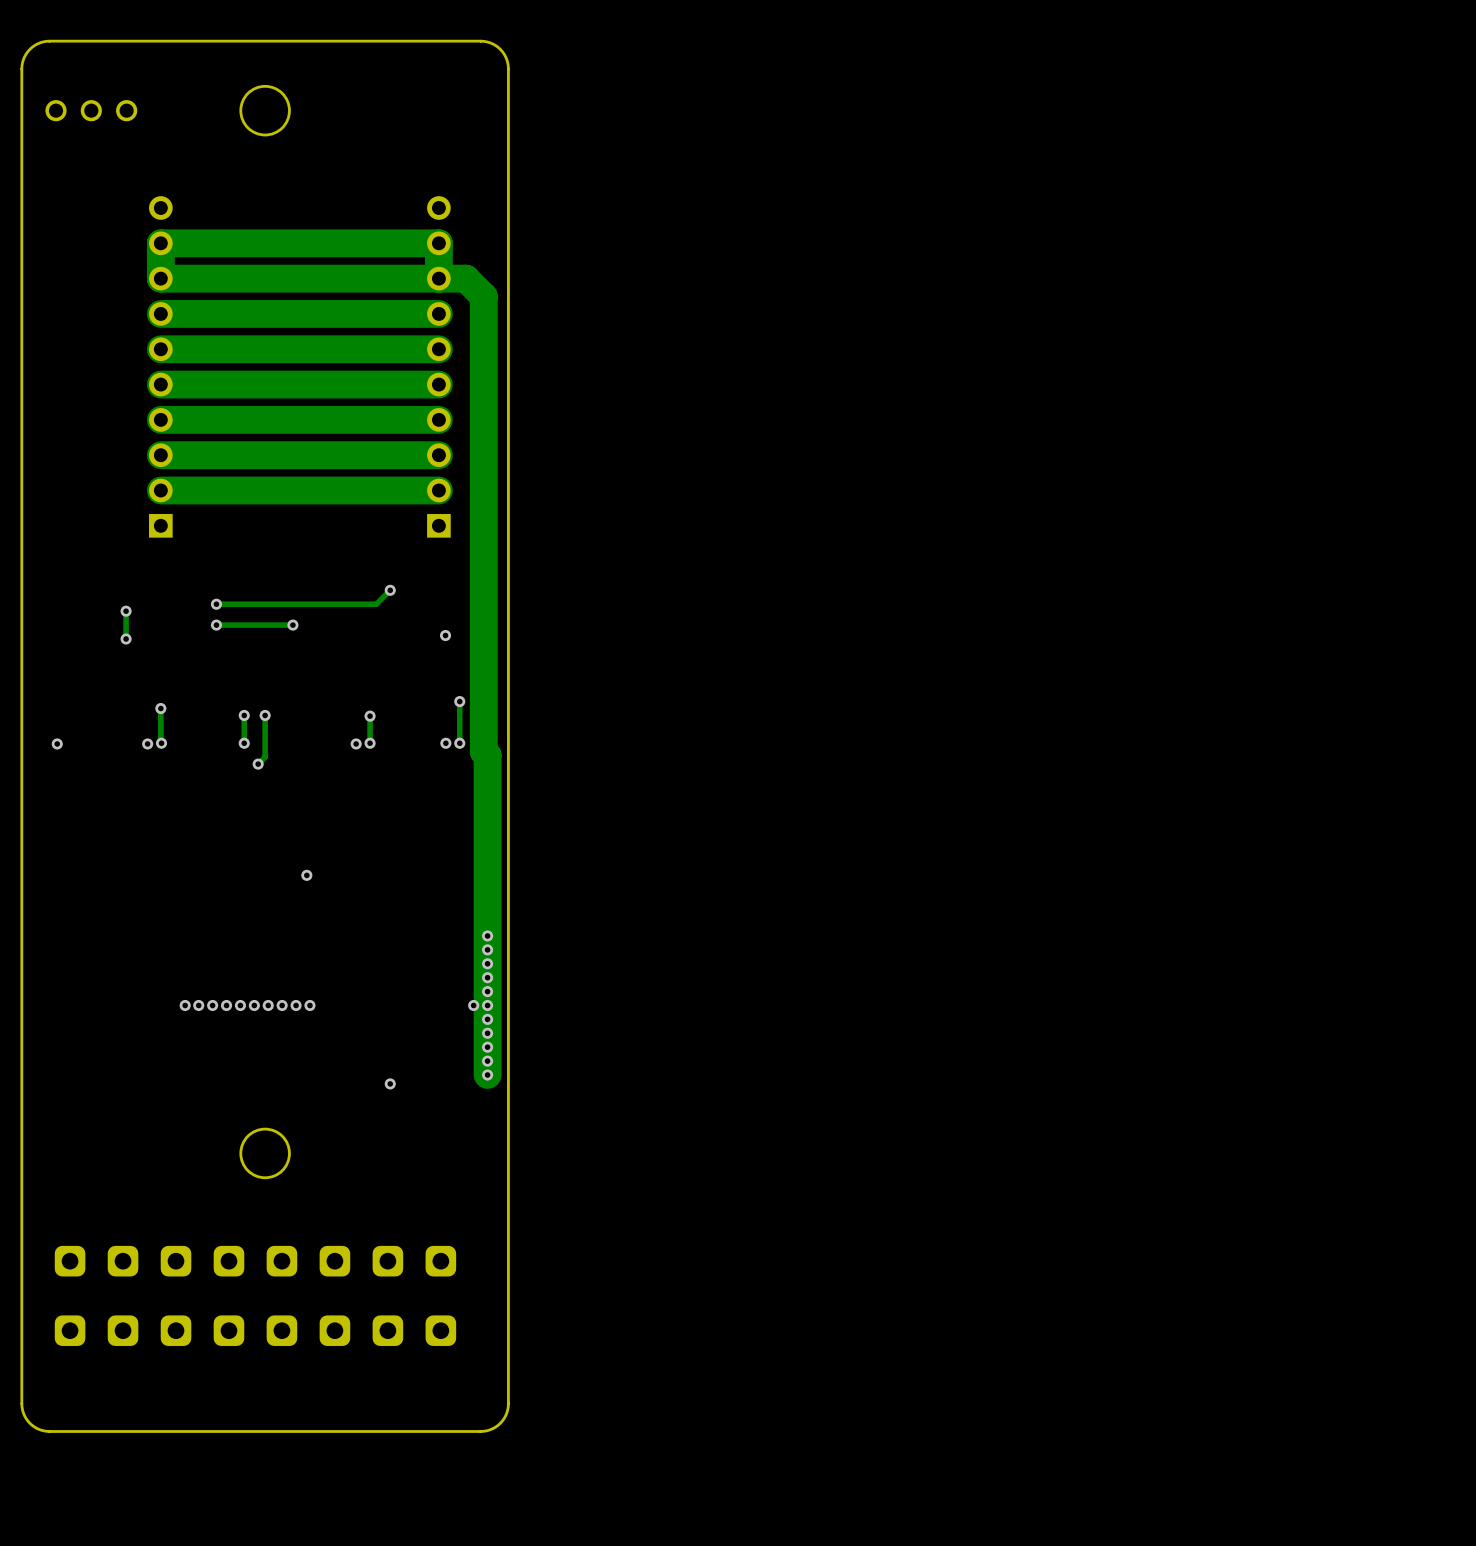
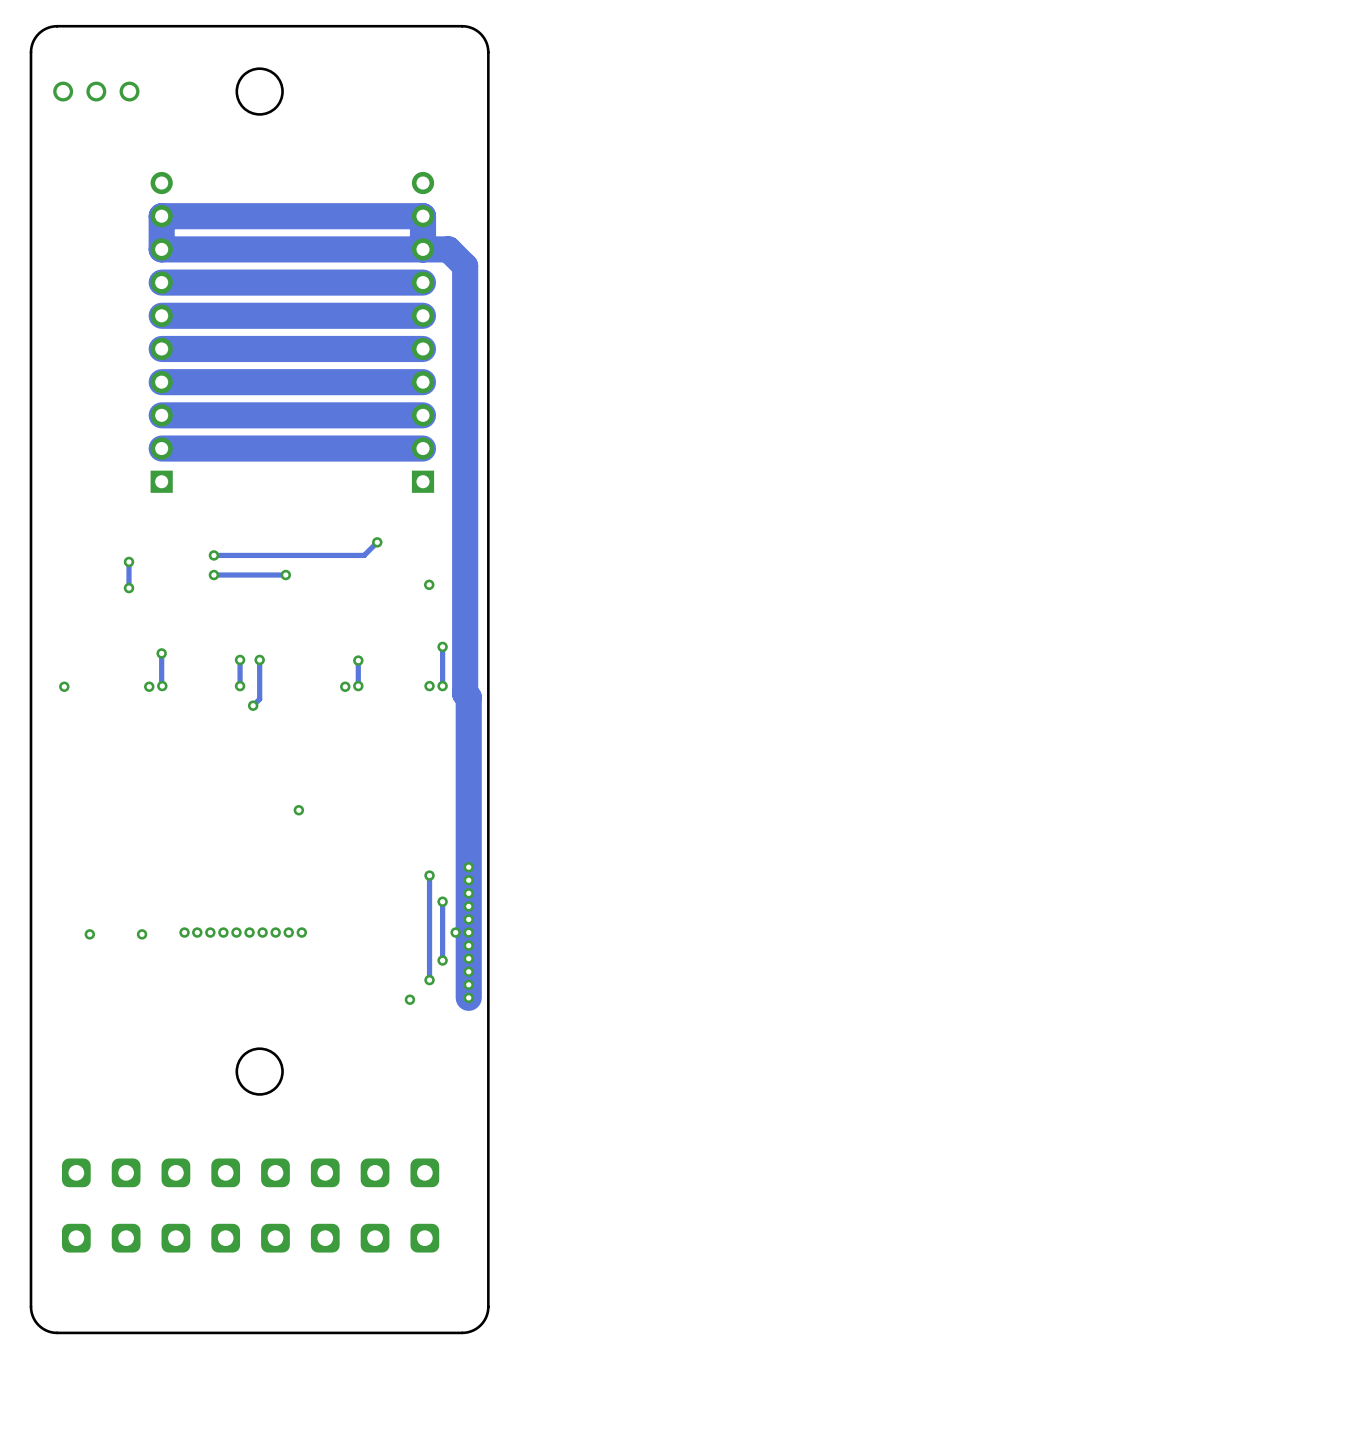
track: none -> (429, 875) (429, 980)
via: none -> (429, 875)
track: none -> (442, 901) (442, 960)
via: none -> (442, 901)
via: none -> (89, 934)
via: none -> (142, 934)
via: none -> (442, 960)
via: none -> (429, 980)
via: none -> (409, 999)
via: (390, 1083) -> none

